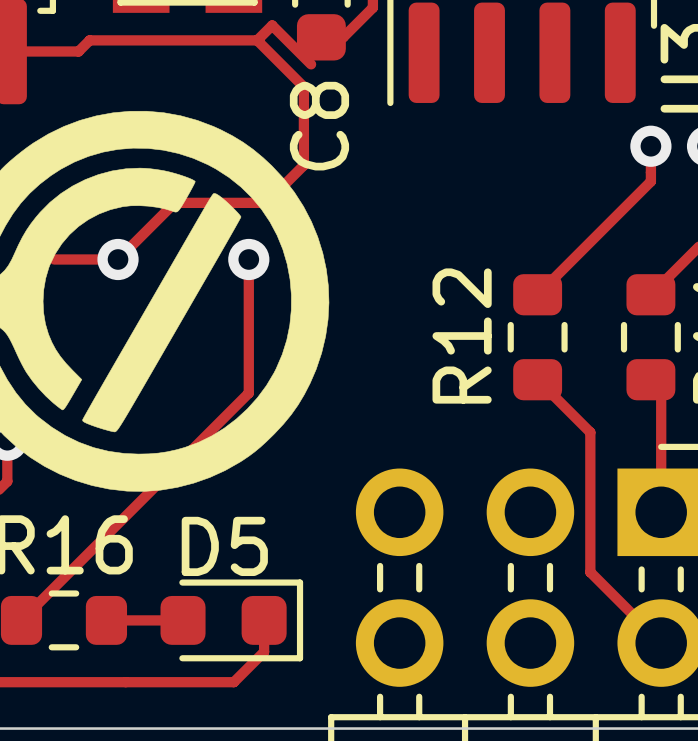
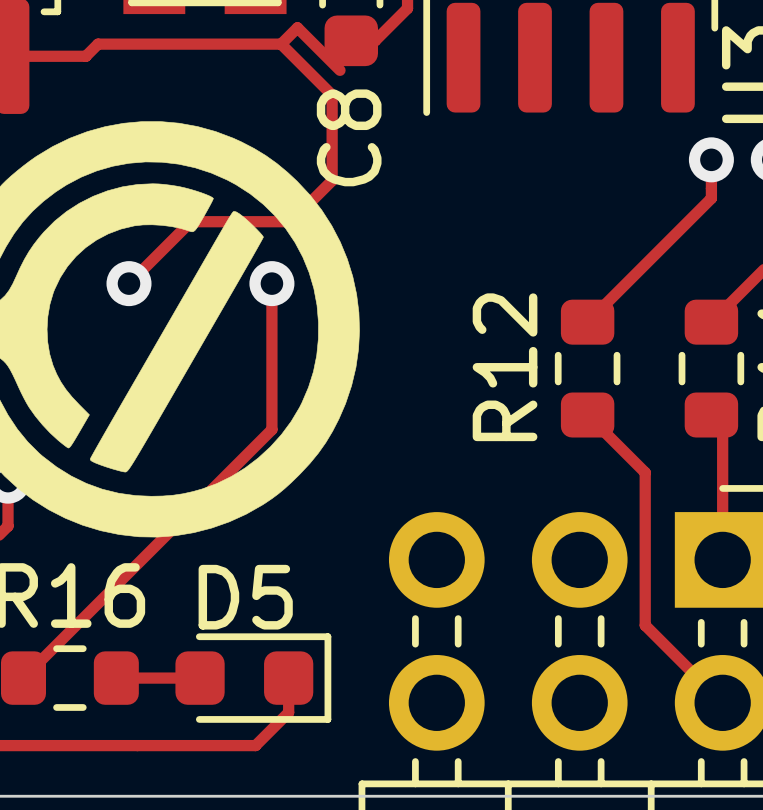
track: (54, 259) (118, 259) -> none

